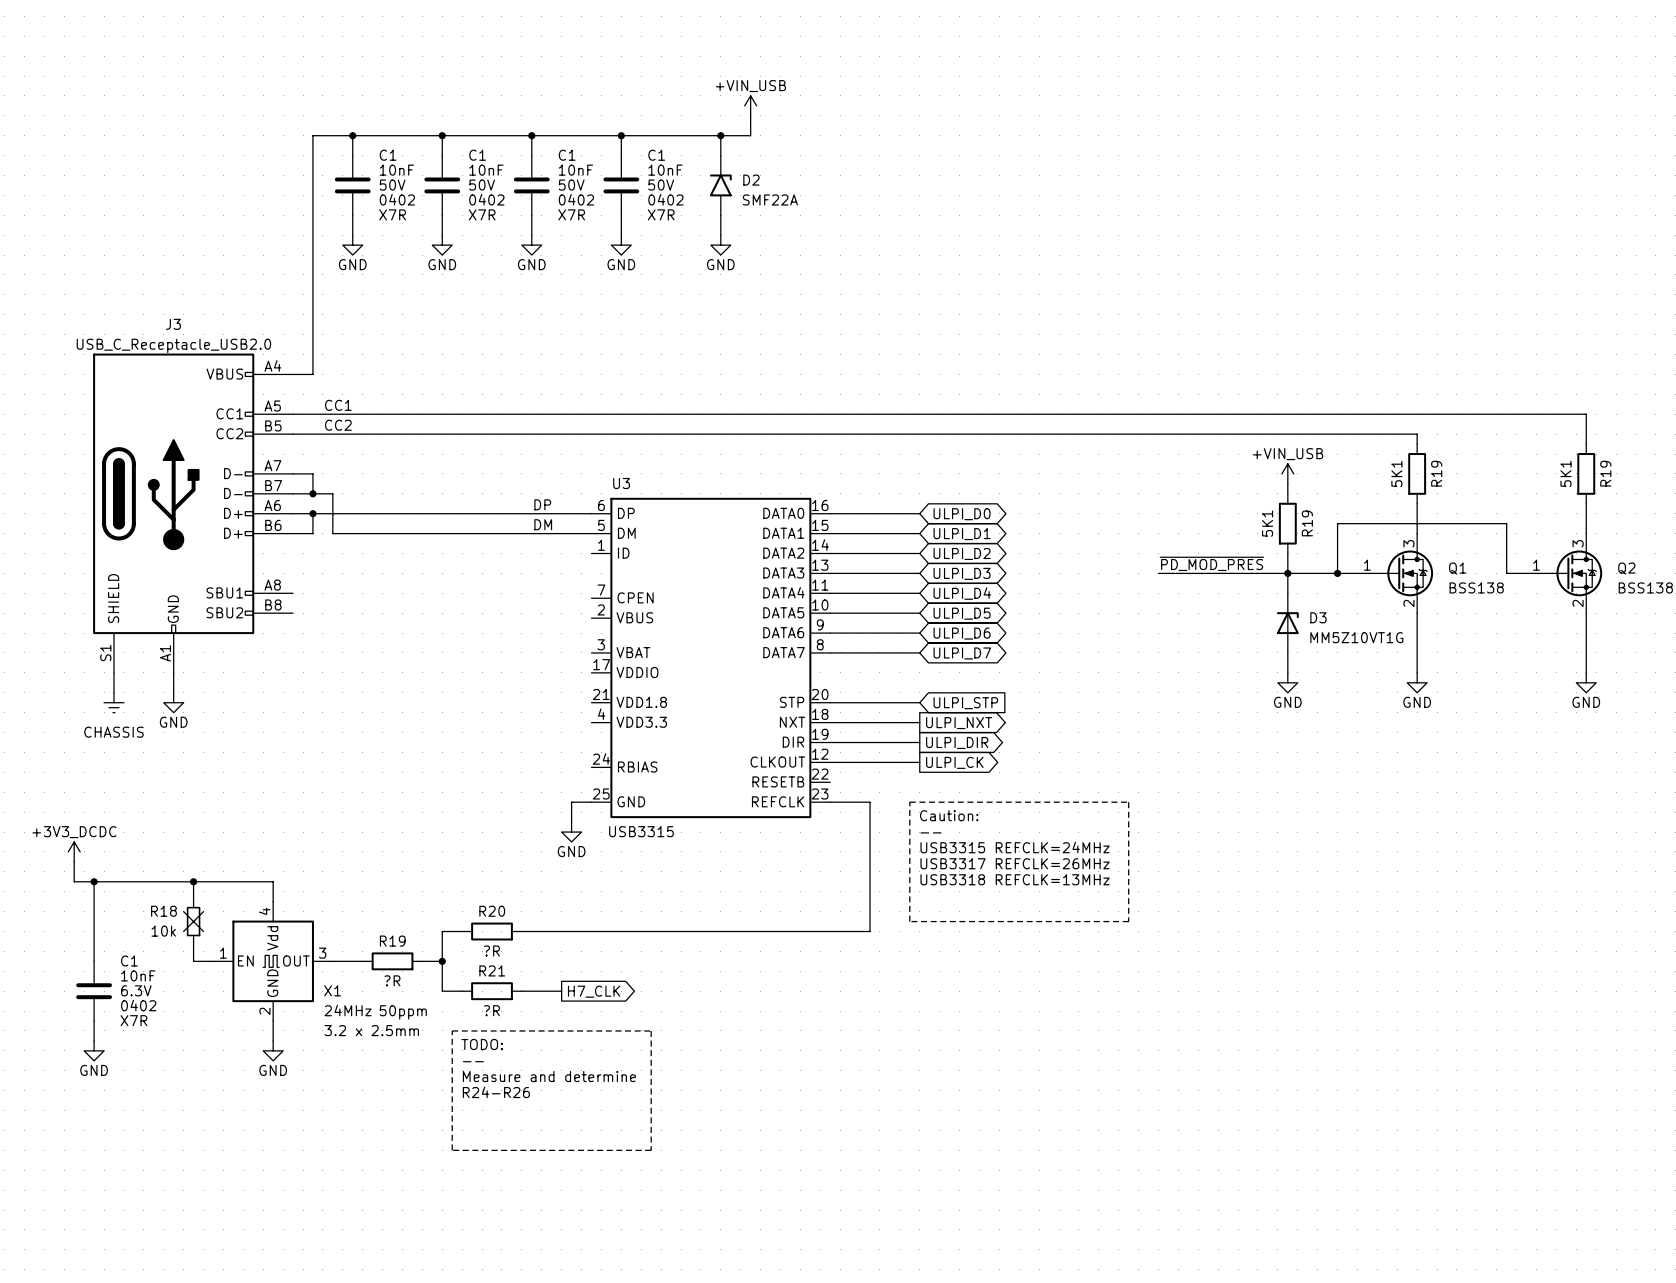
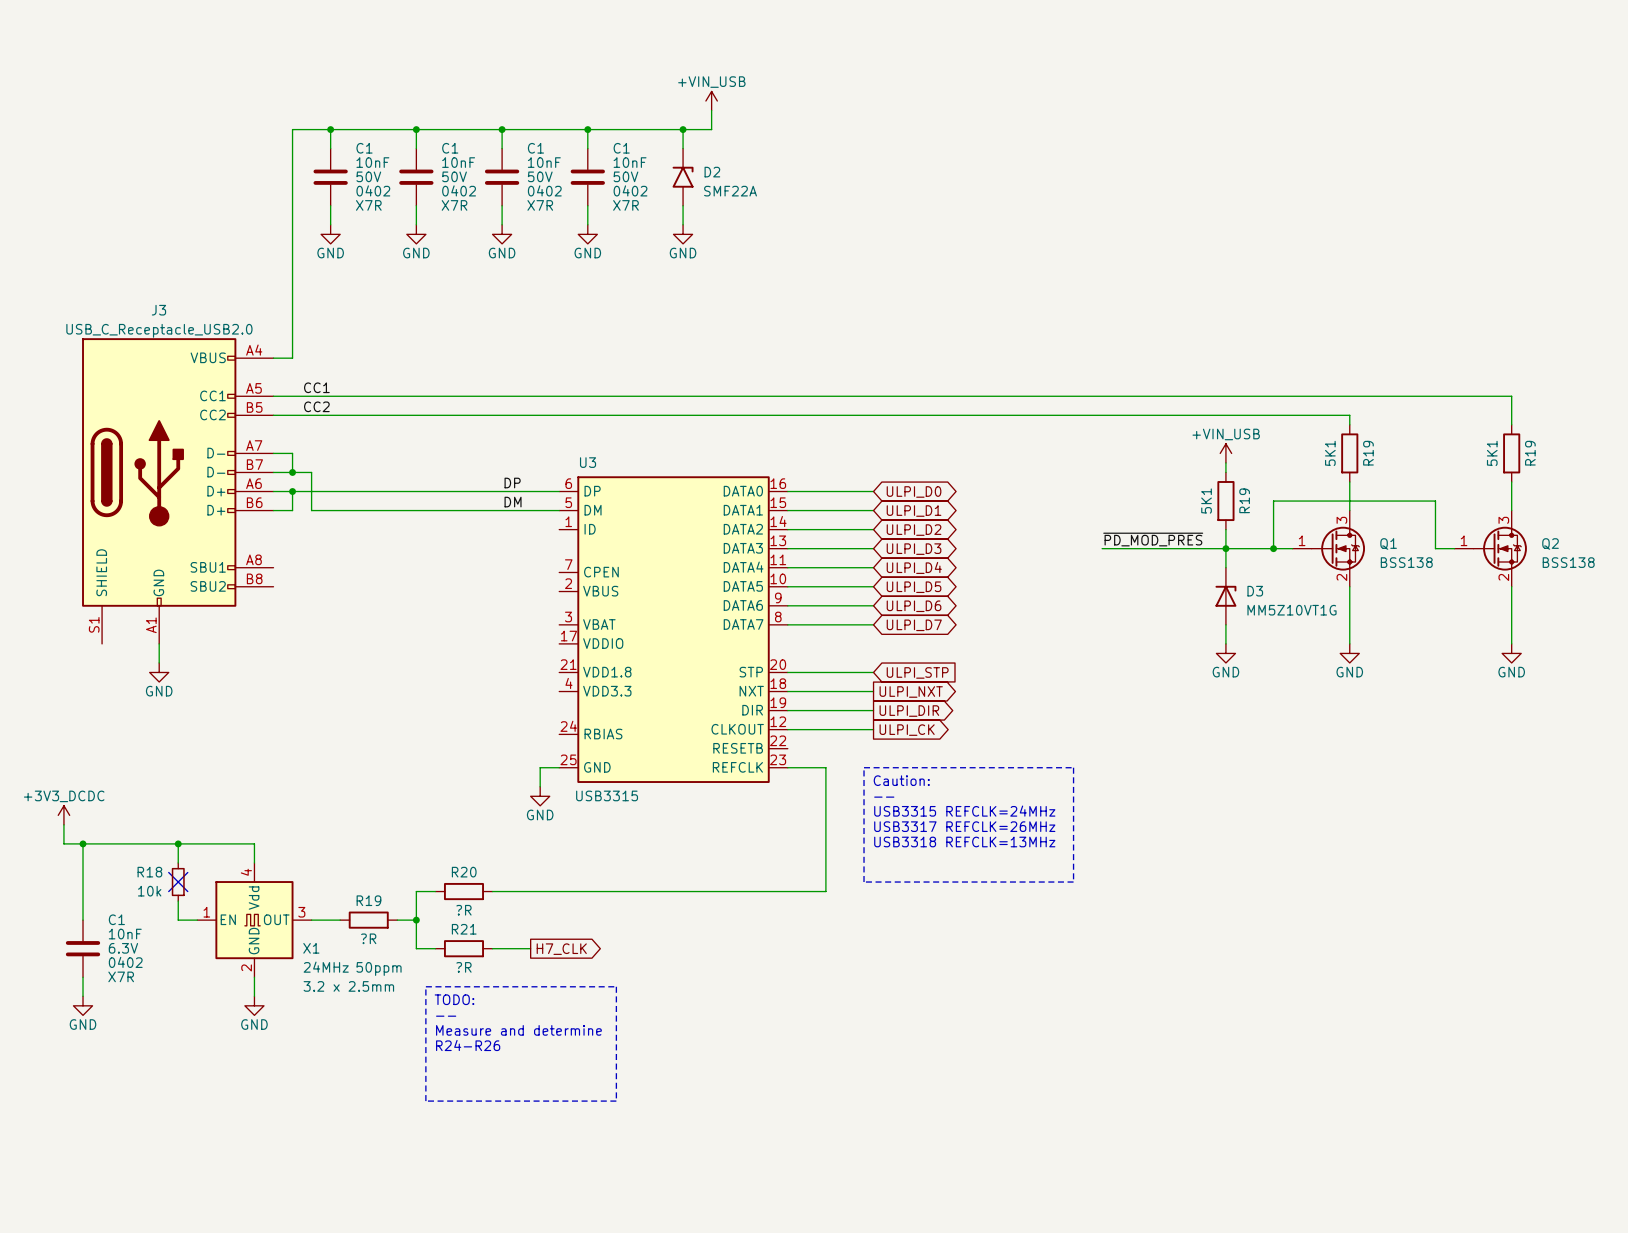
wire: (113, 672) (113, 692) -> none
power symbol: CHASSIS (113, 702) -> none

